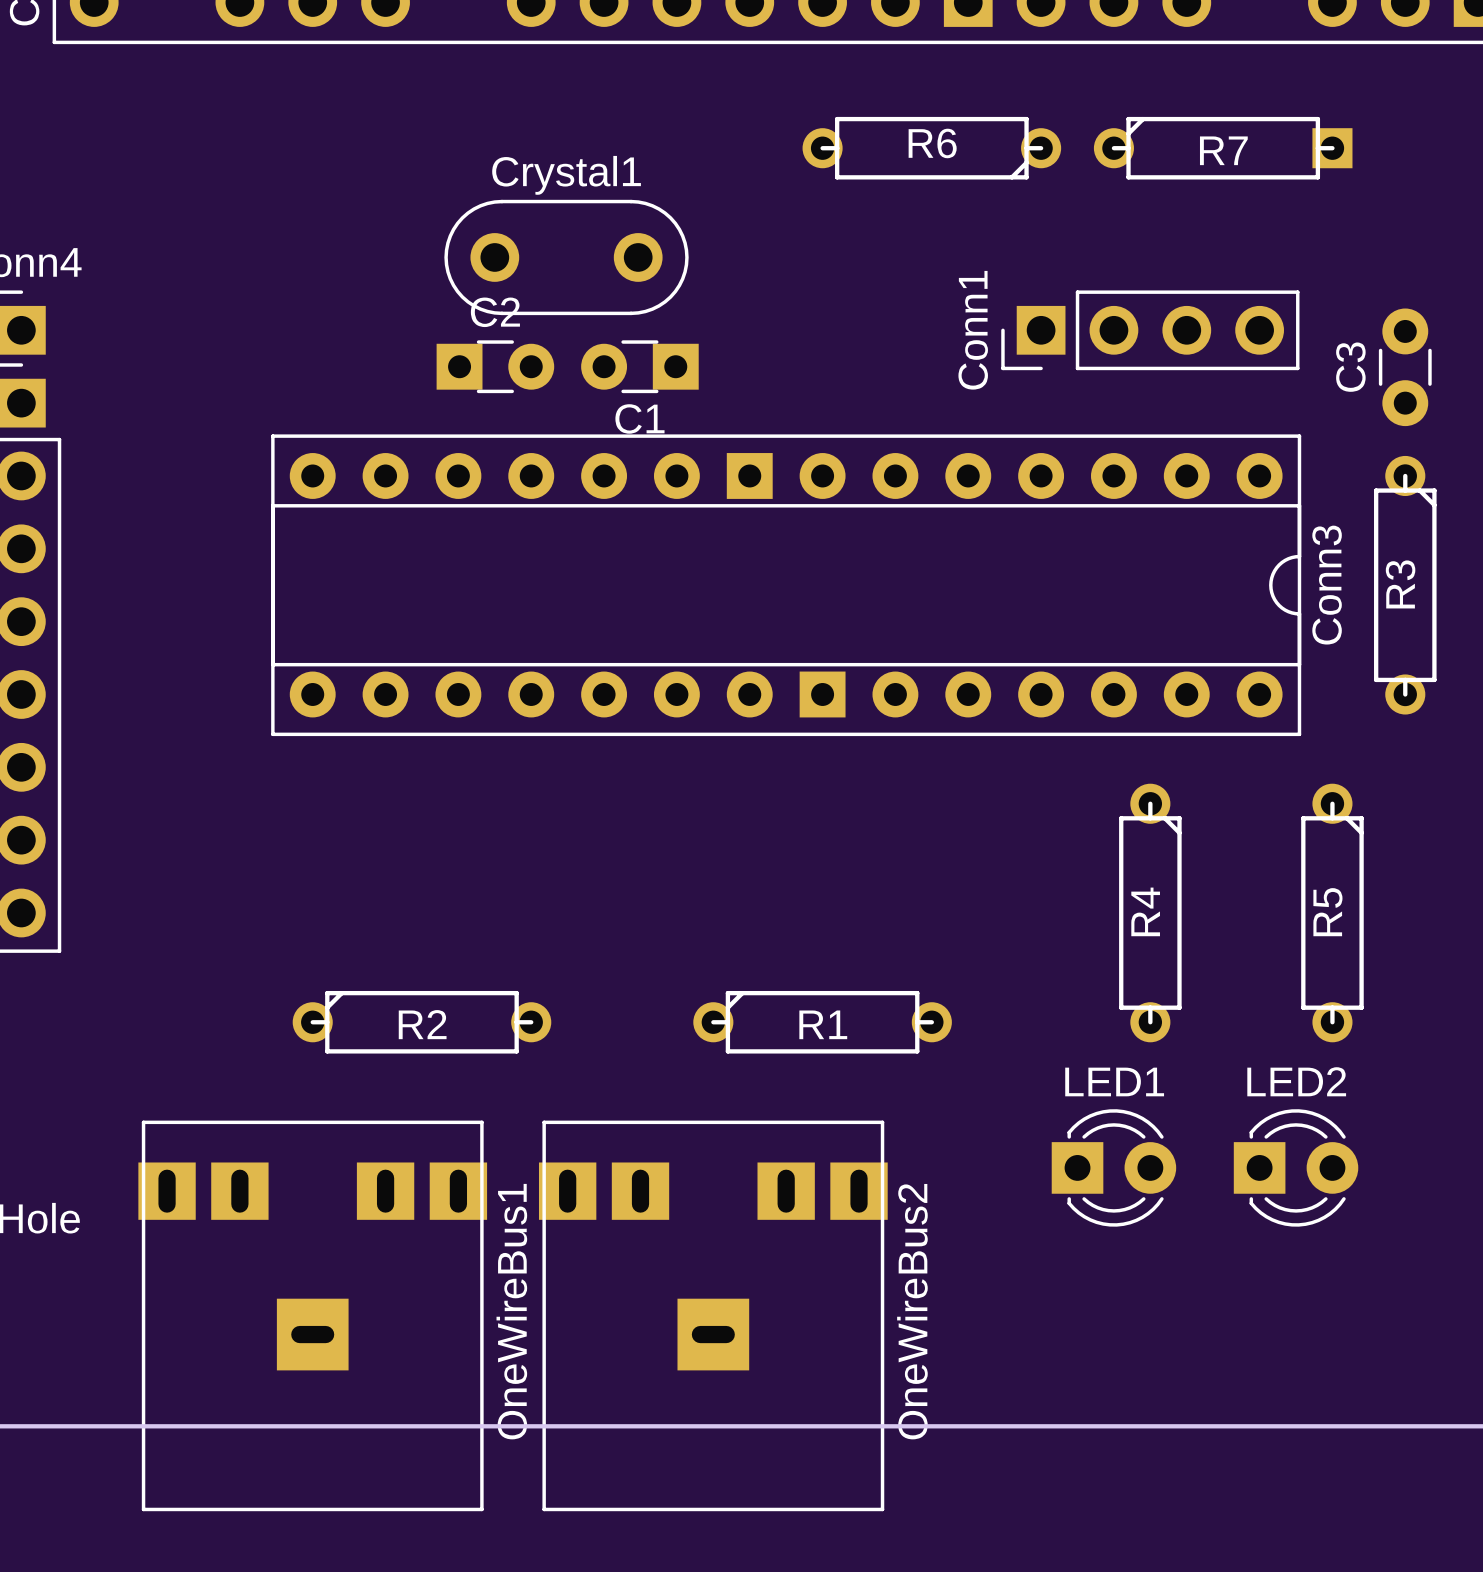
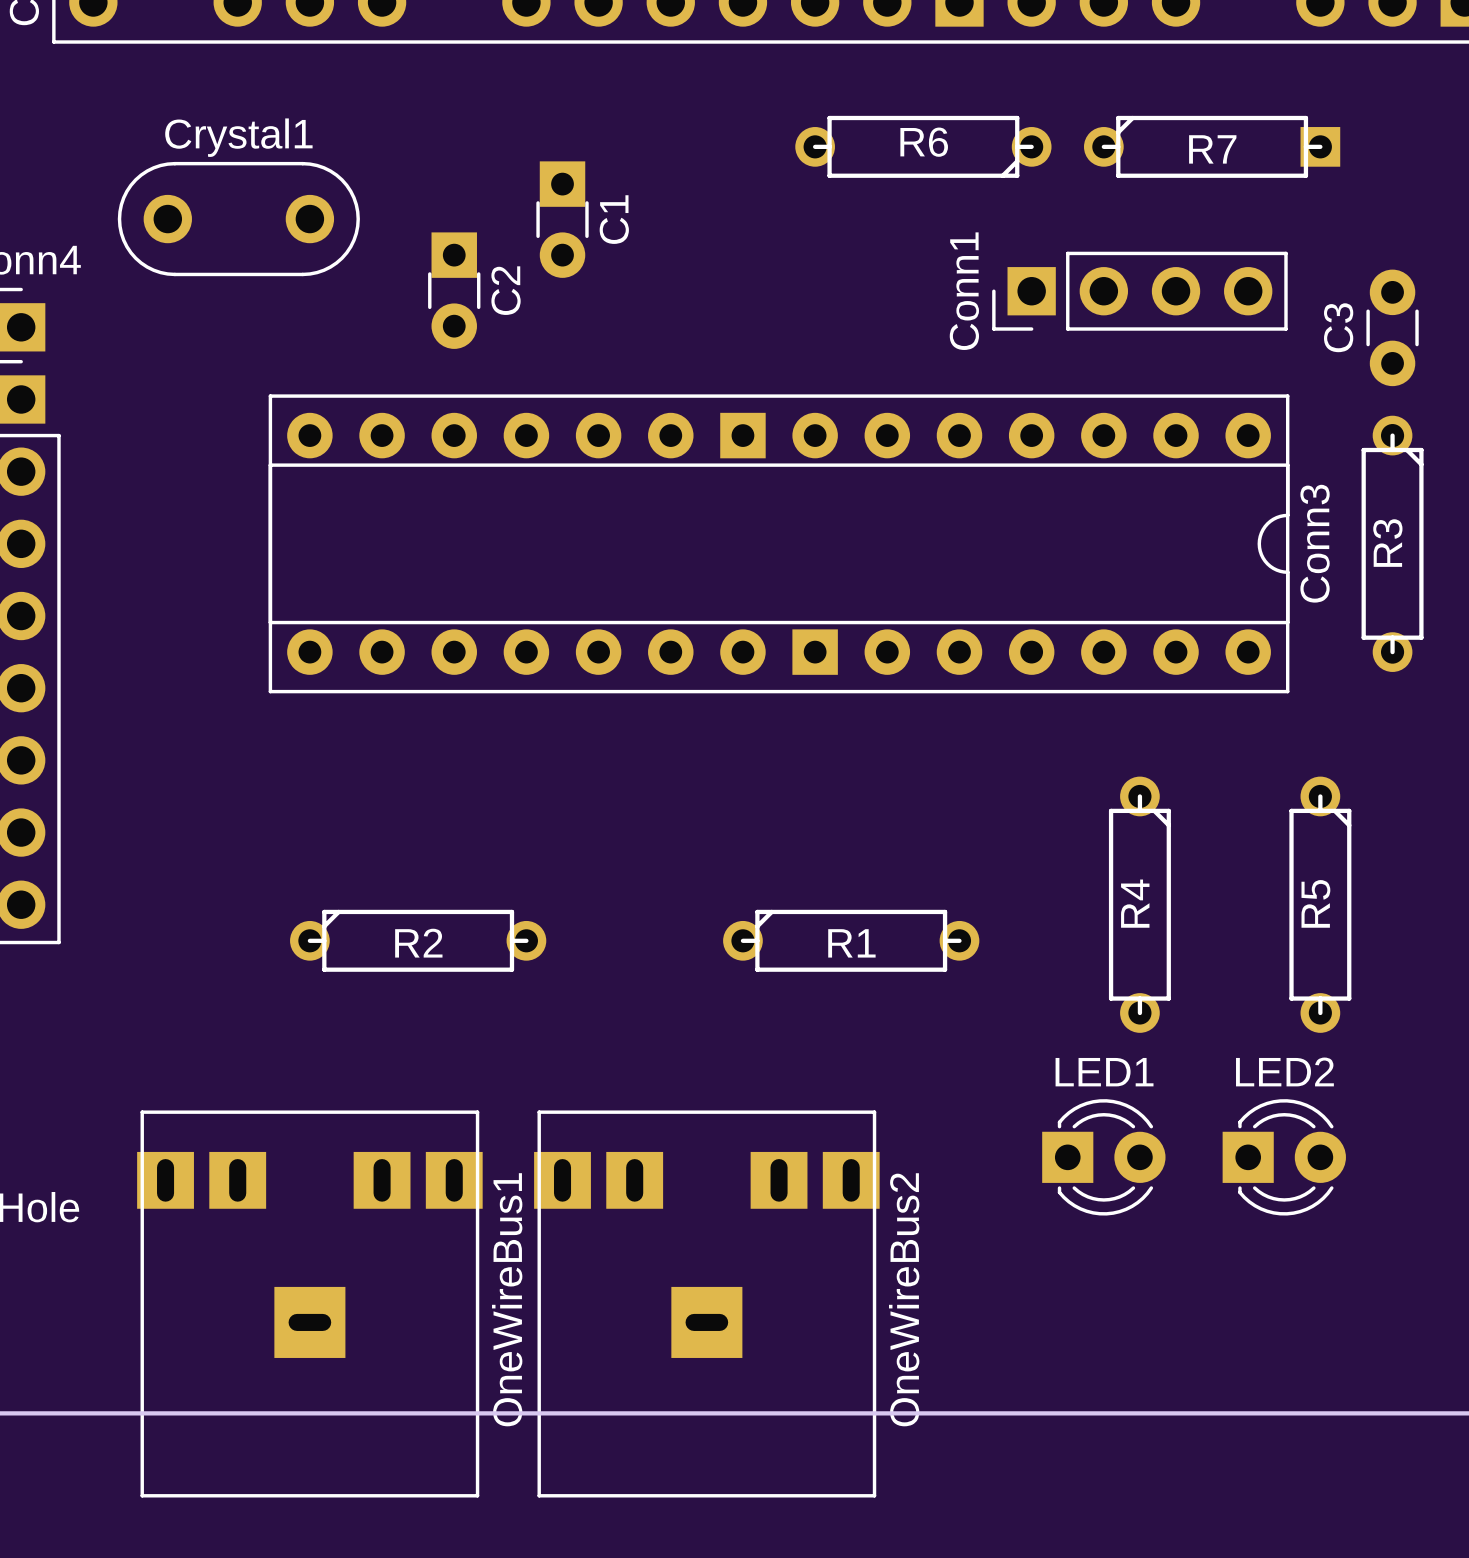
Crystal1 position: (566, 257) -> (238, 219)
Conn1 position: (1150, 330) -> (1139, 291)
C2 rotation: 0° (495, 366) -> 90° clockwise (454, 290)
C2 position: (495, 366) -> (454, 290)
C1 rotation: 0° (639, 366) -> 90° counterclockwise (562, 219)
C1 position: (639, 366) -> (562, 219)
C3 position: (1405, 367) -> (1392, 327)
Conn3 position: (786, 585) -> (779, 543)
R3 position: (1405, 585) -> (1392, 543)
R2 position: (421, 1022) -> (418, 940)
R1 position: (822, 1022) -> (851, 940)

